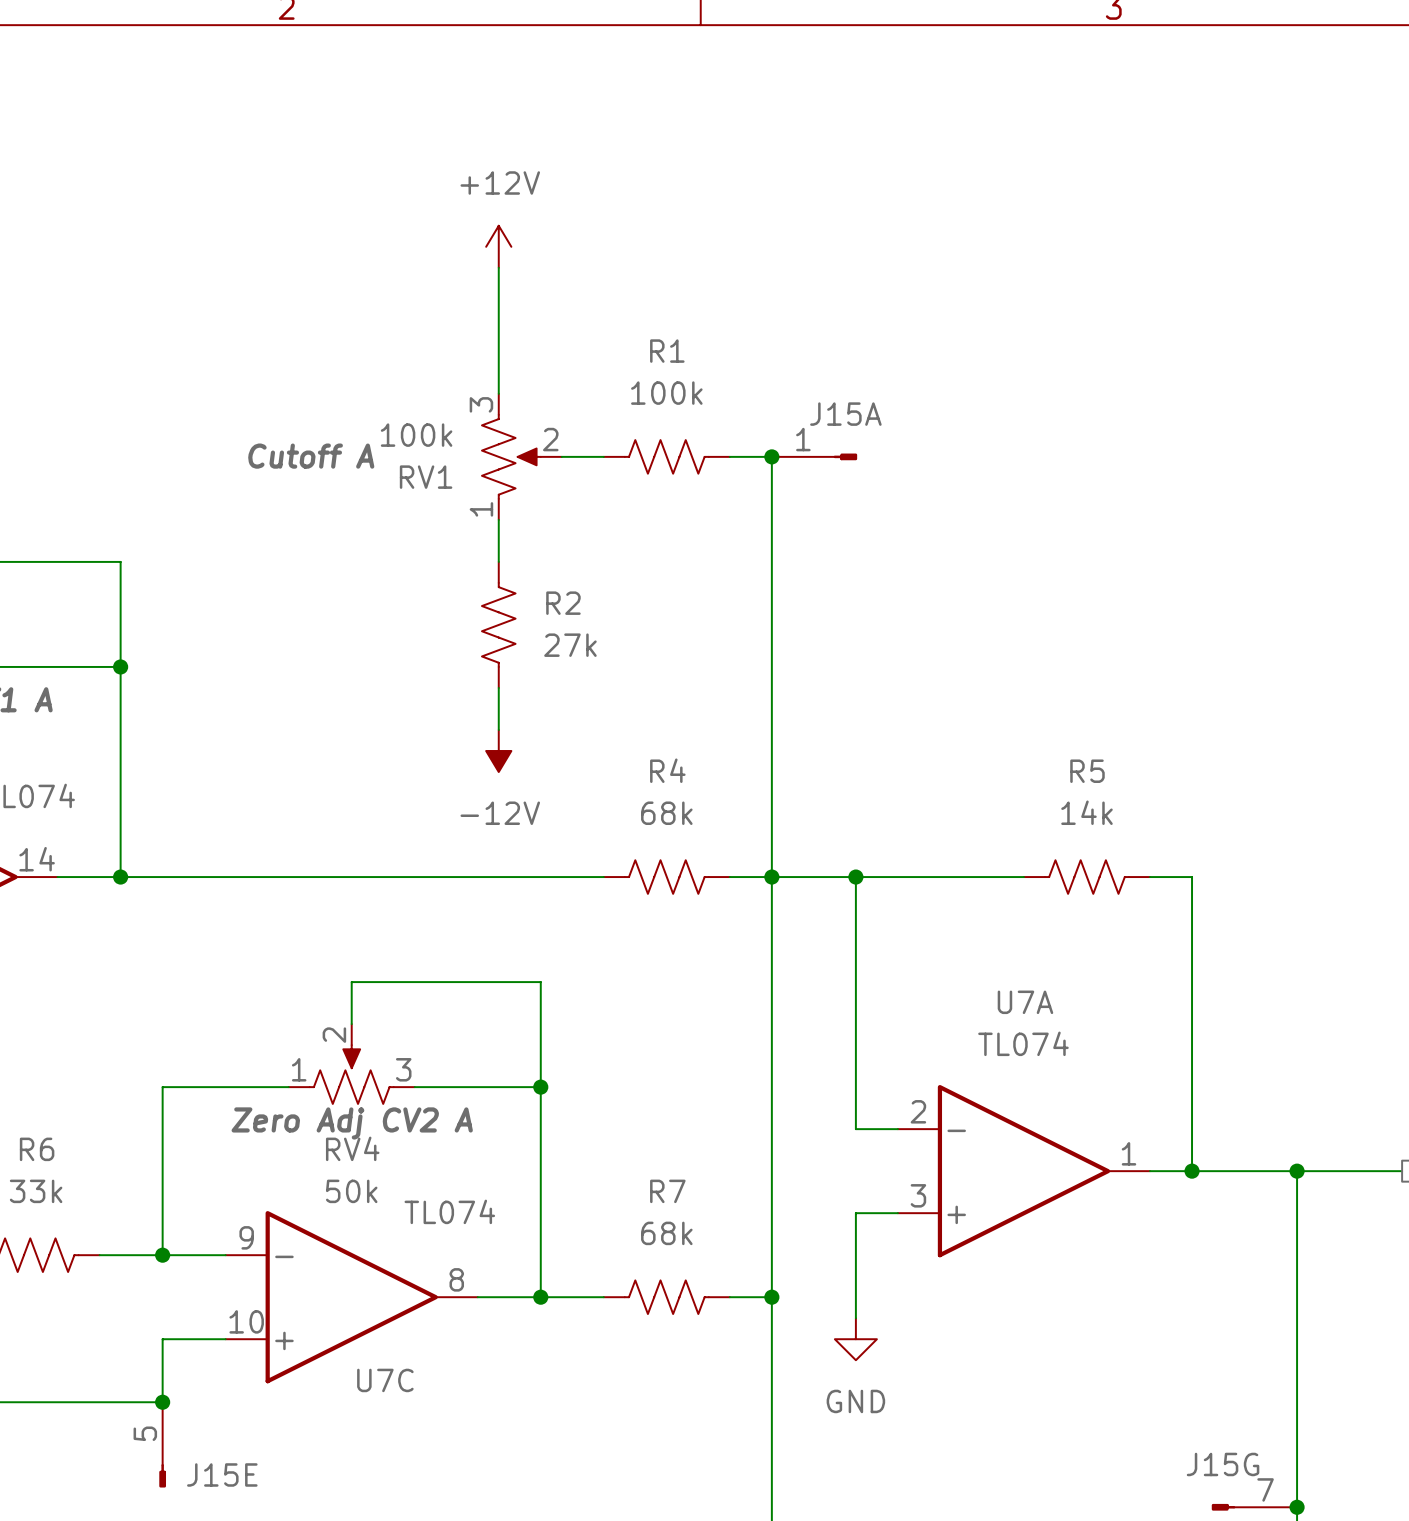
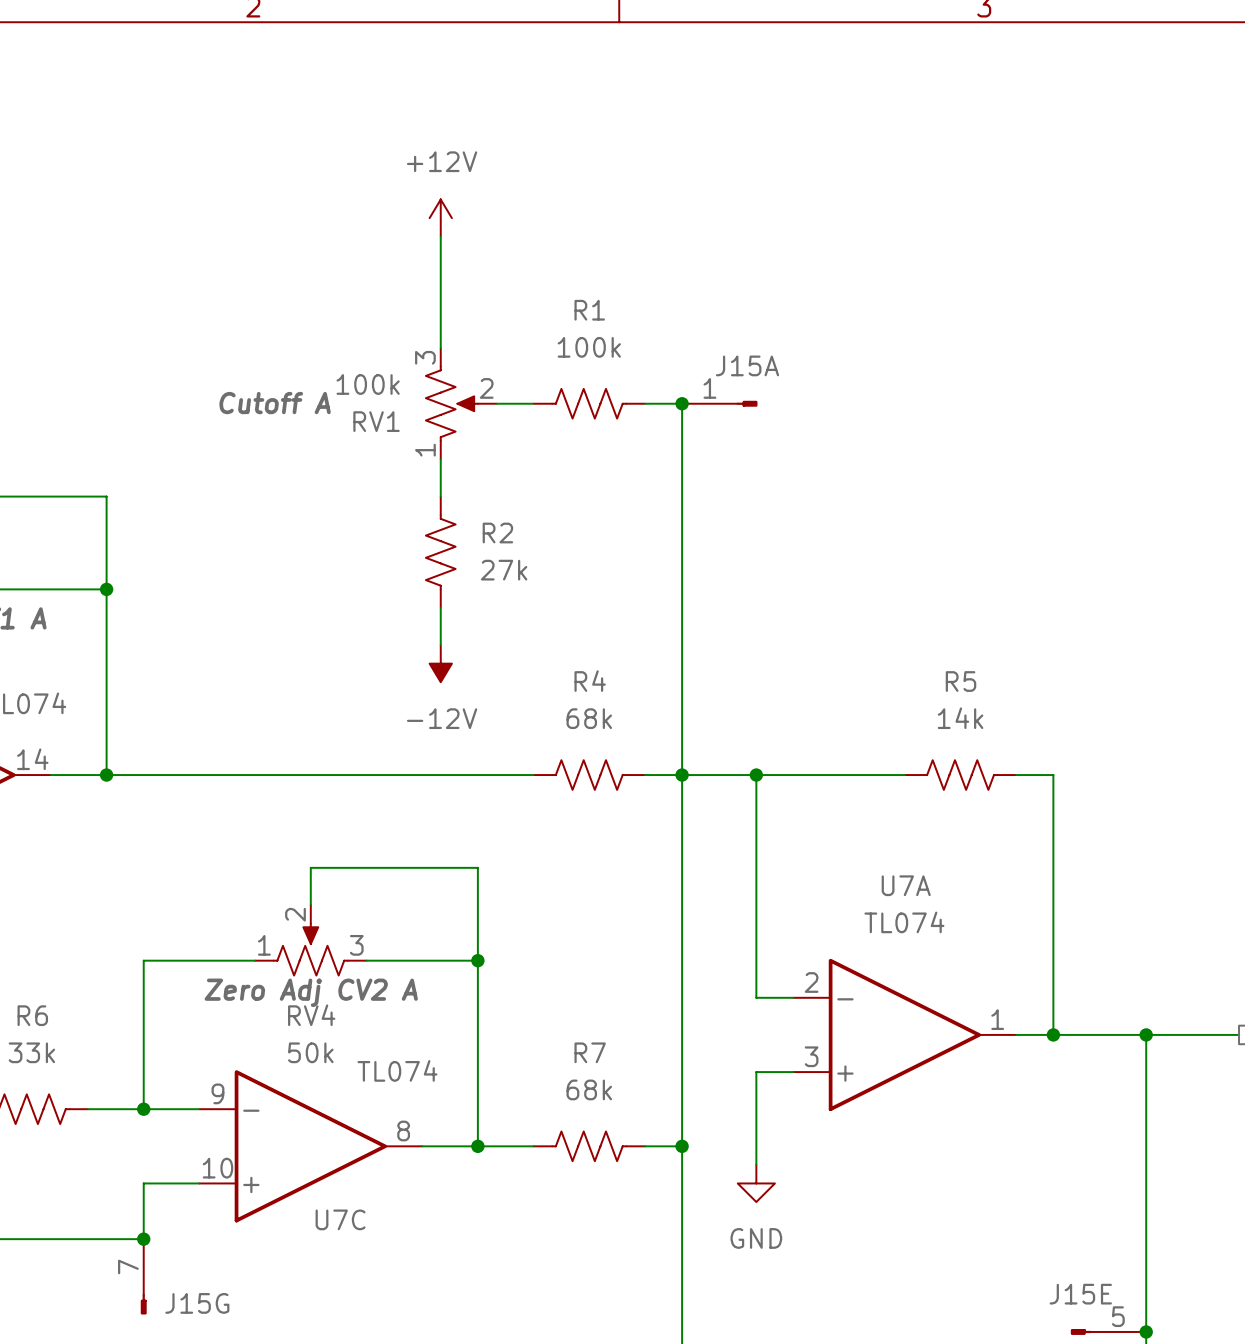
J15E position: (162, 1444) -> (1108, 1331)
J15G name position: J15G (1223, 1464) -> J15G (197, 1303)
J15E name position: J15E (222, 1474) -> J15E (1080, 1294)
J15E rotation: 0° (162, 1475) -> 90° clockwise (1081, 1331)
J15G rotation: 0° (1223, 1507) -> 90° counterclockwise (143, 1304)
J15G position: (1254, 1507) -> (143, 1276)

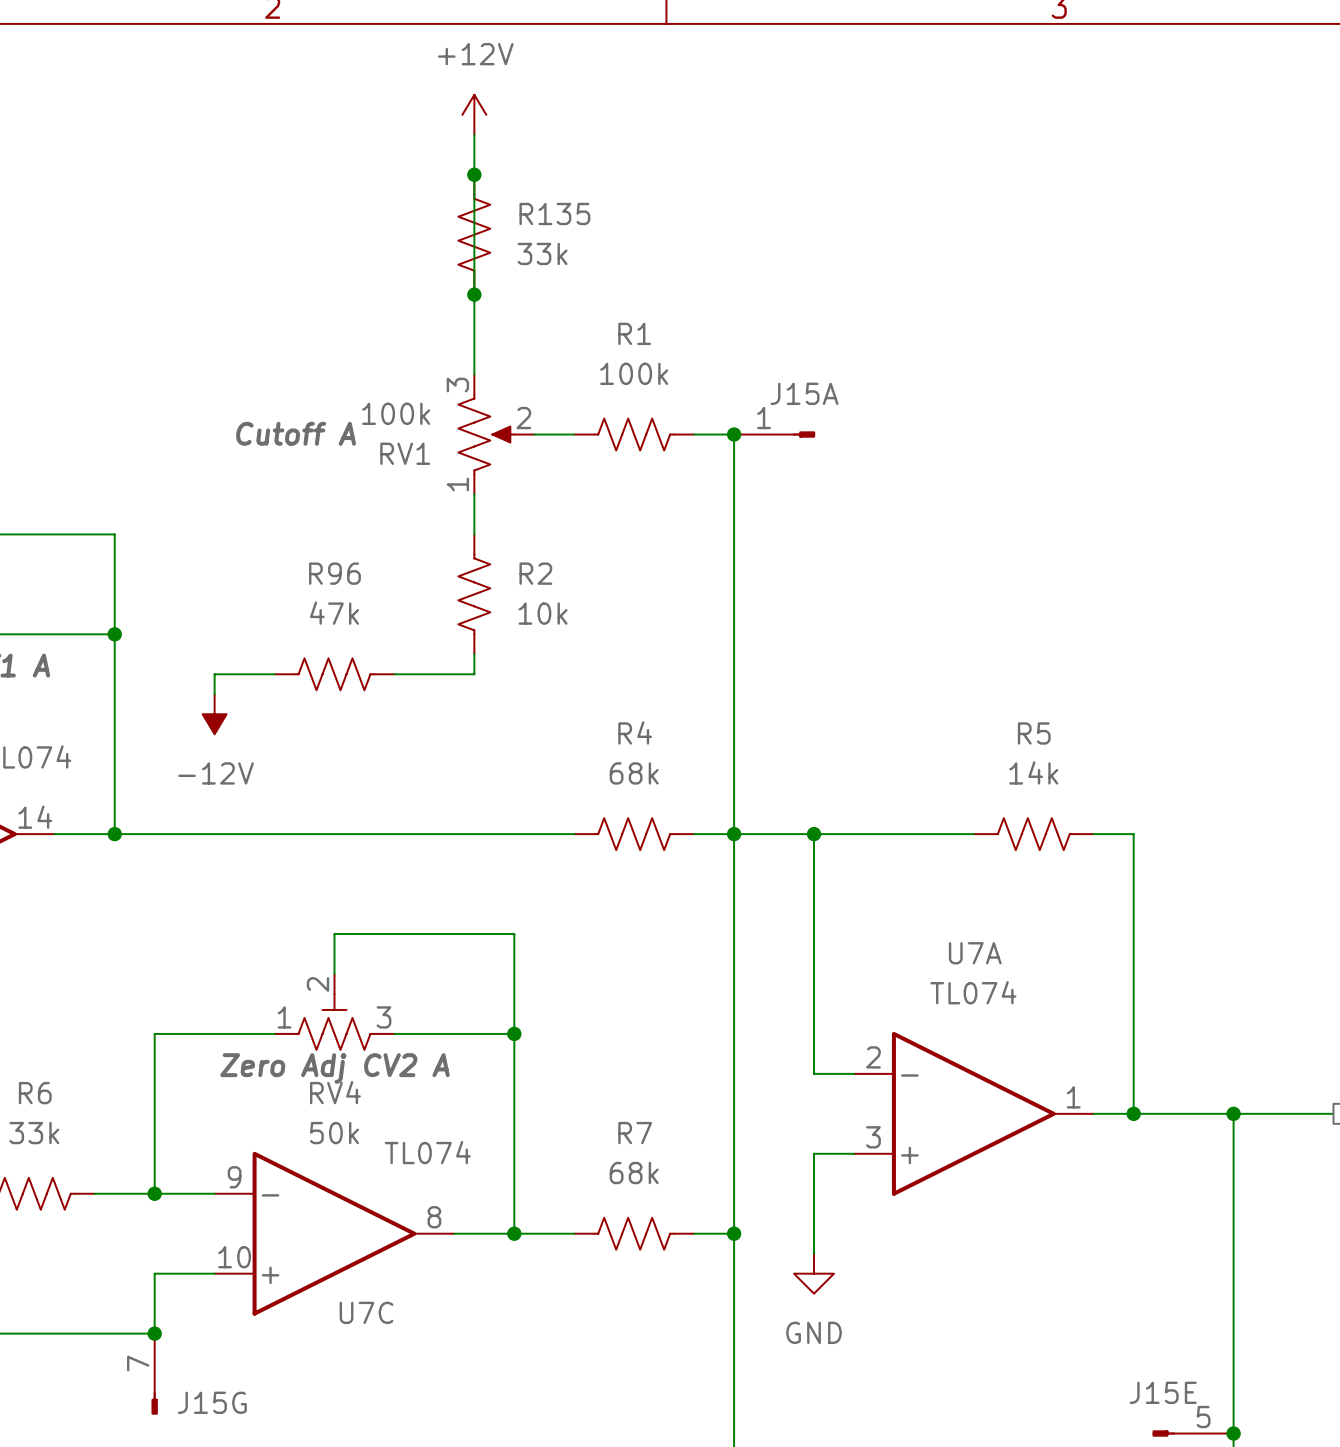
wire: none -> (474, 134) (474, 254)
junction: none -> (474, 174)
R135: none -> 33k (474, 234)
power symbol position: +12V (440, 218) -> +12V (474, 114)
junction: none -> (474, 294)
R2 value: 27k (504, 570) -> 10k (543, 613)
wire: none -> (274, 674) (214, 674) (214, 694)
R96: none -> 47k (334, 674)
wire: (440, 626) (440, 645) -> (474, 674) (394, 674)
power symbol position: -12V (440, 663) -> -12V (214, 714)
RV4 symbol: [255, 904, 367, 976] -> [274, 973, 395, 1050]

